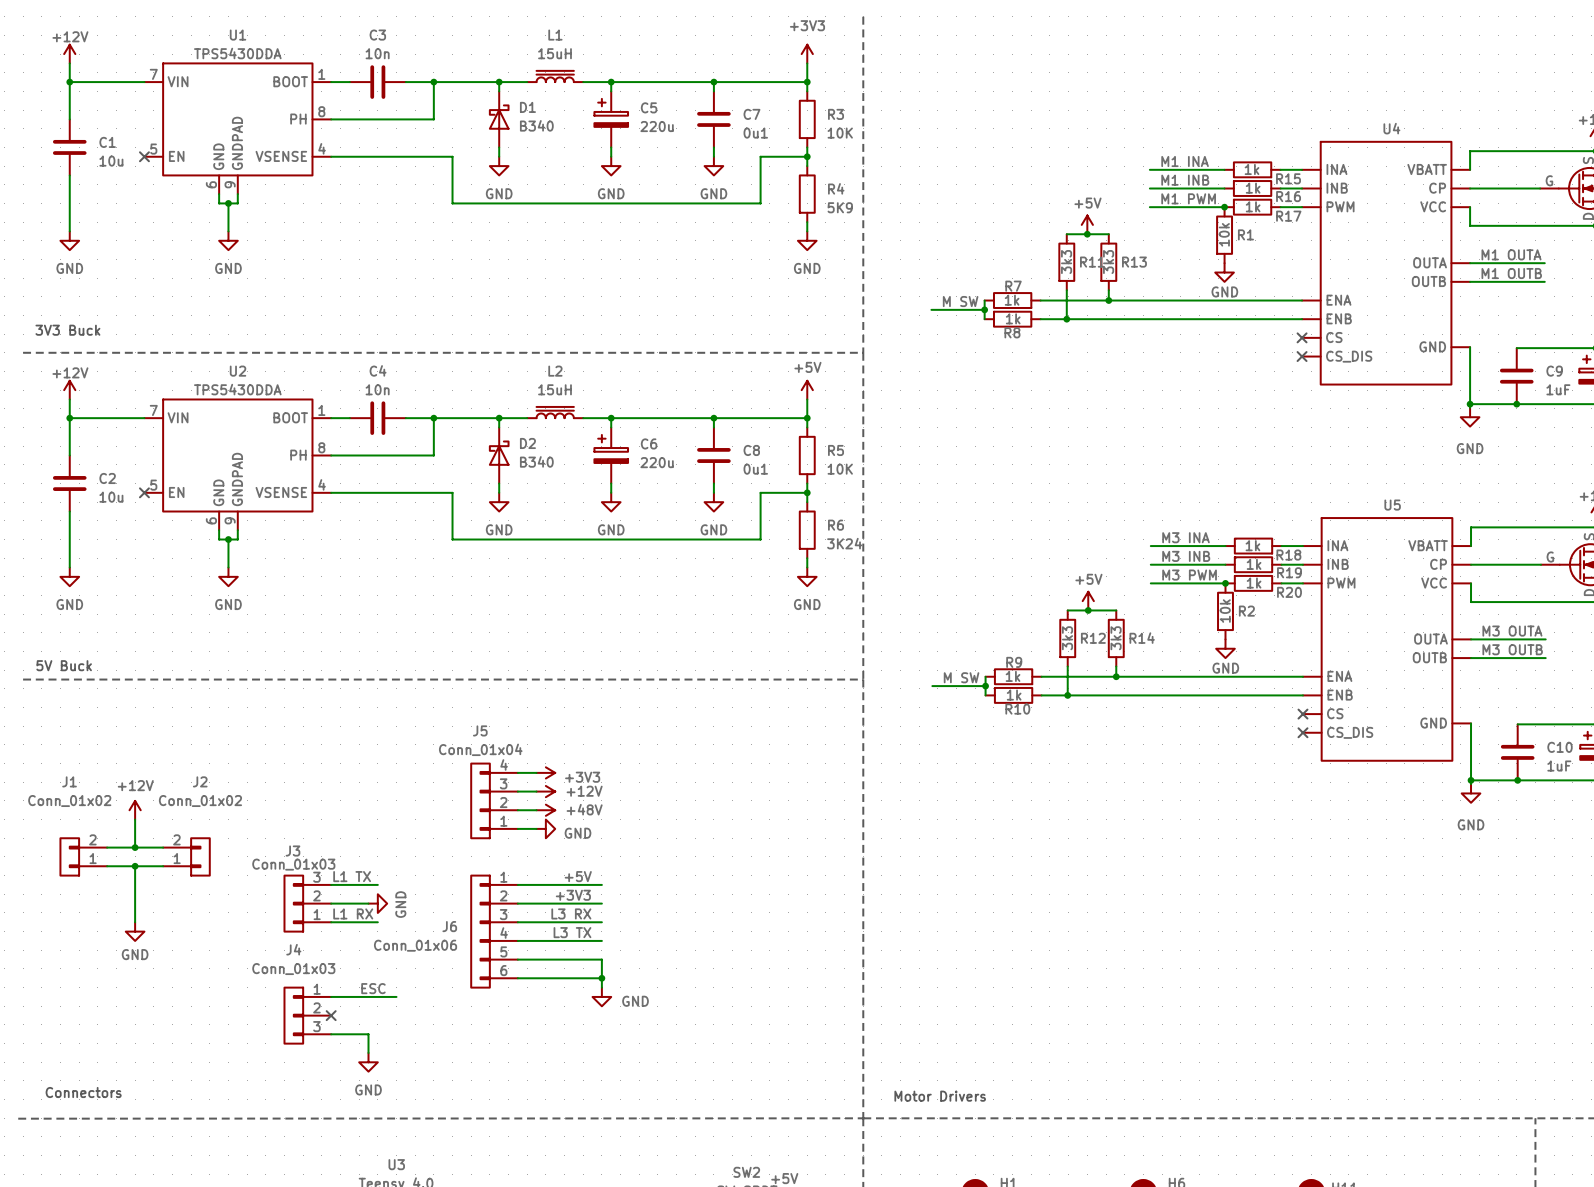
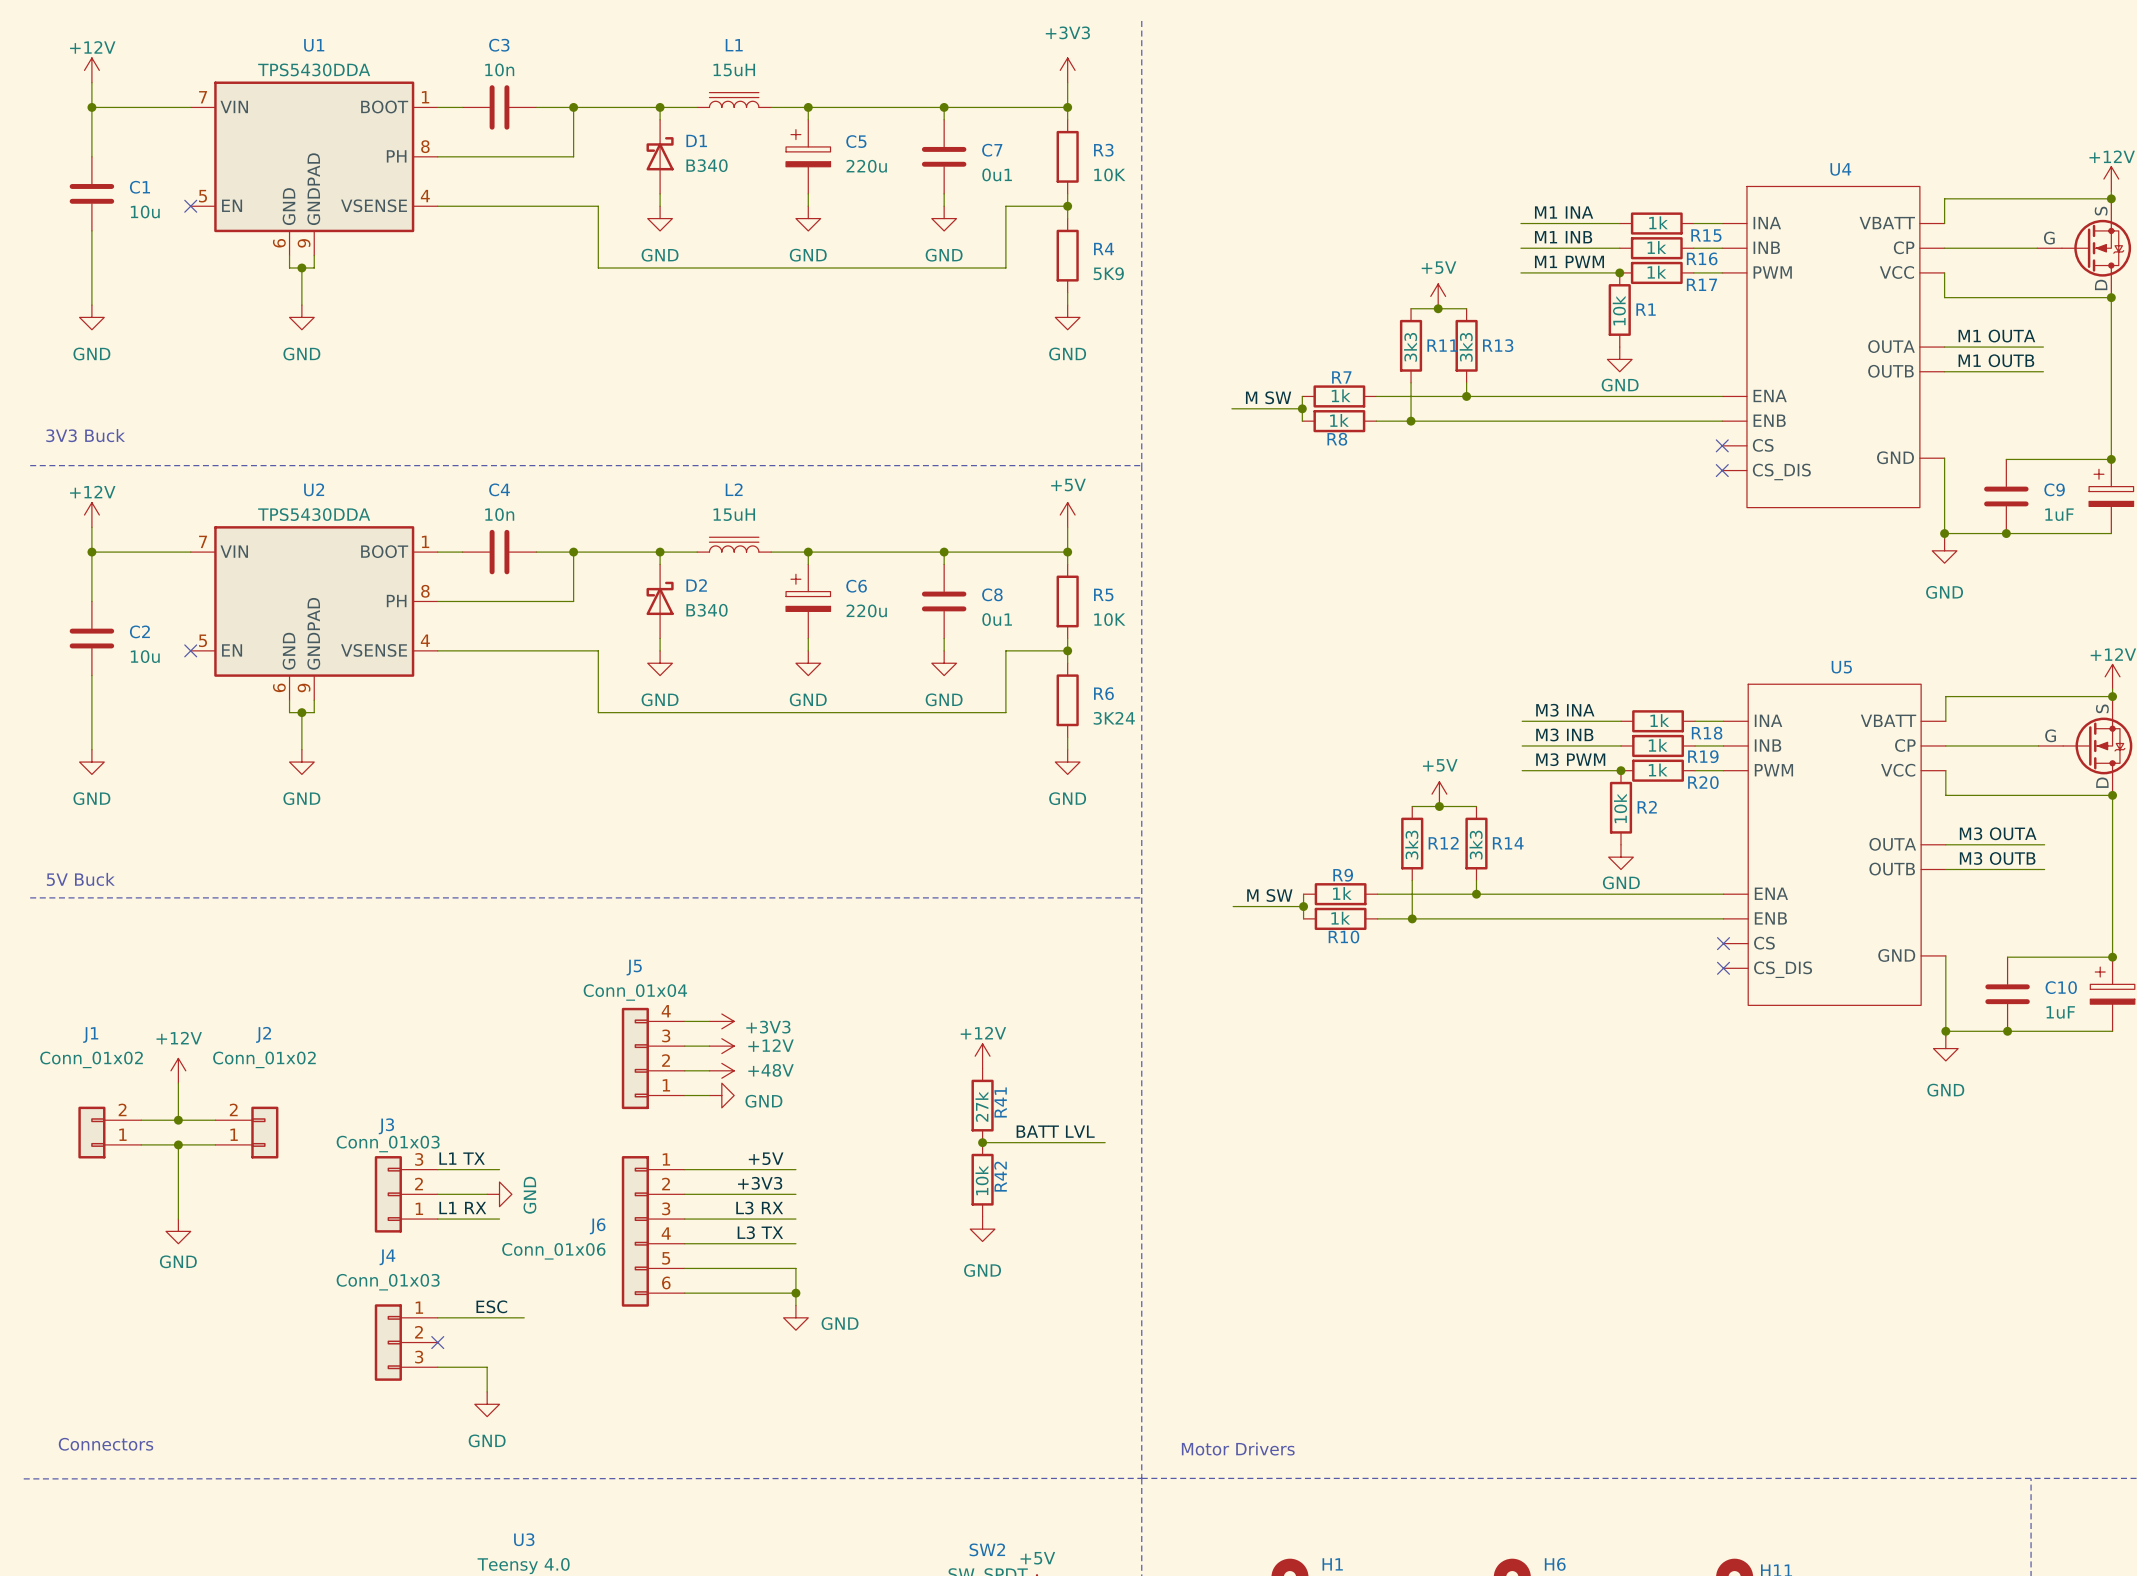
power symbol: none -> +12V (982, 1056)
R41: none -> 27k (982, 1105)
label: none -> BATT LVL (1055, 1131)
wire: none -> (982, 1142) (1105, 1142)
junction: none -> (982, 1142)
R42: none -> 10k (982, 1179)
power symbol: none -> GND (982, 1229)

